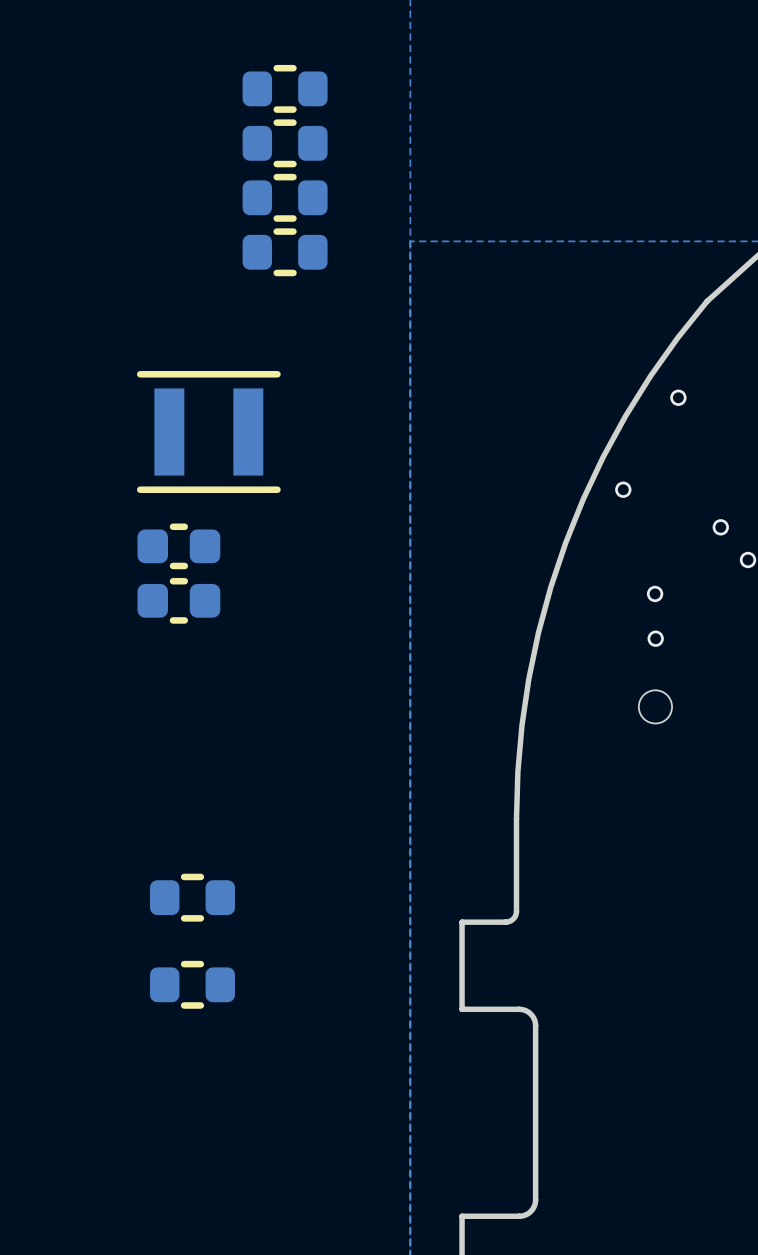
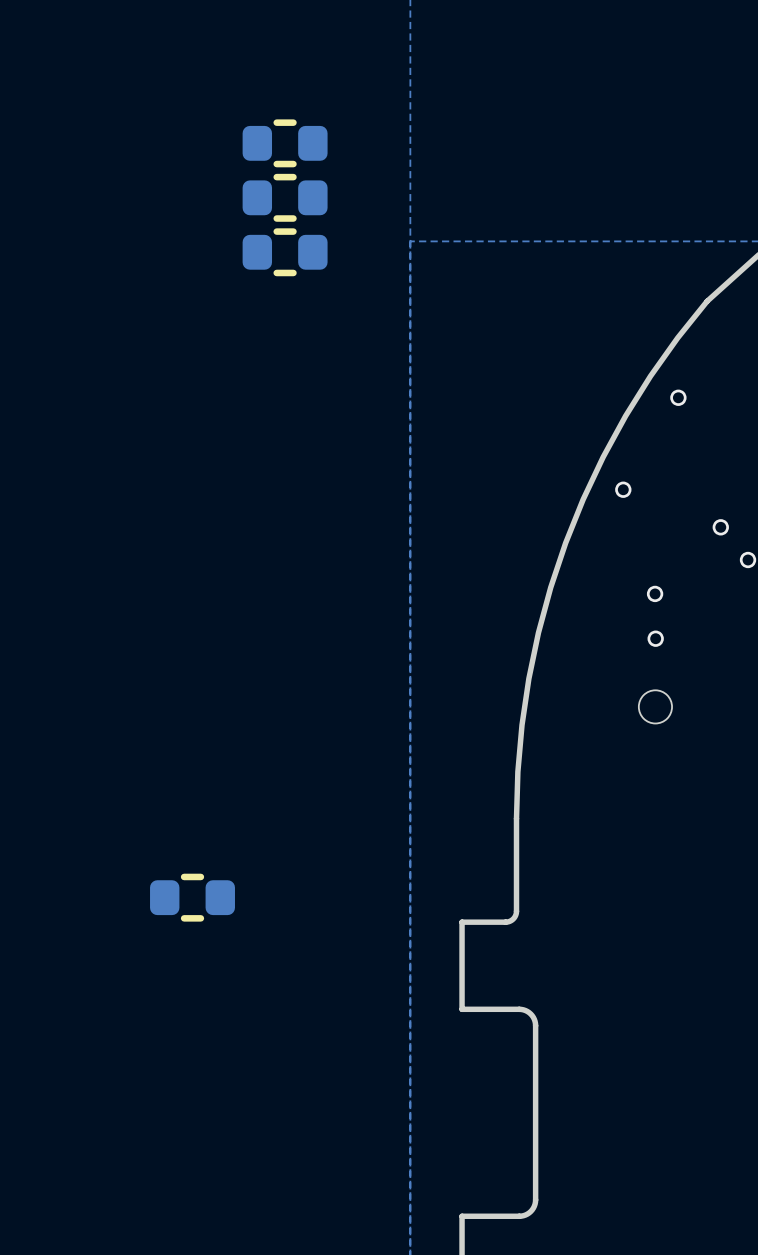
part: (285, 88) -> none
part: (208, 432) -> none
part: (178, 546) -> none
part: (178, 600) -> none
part: (192, 984) -> none

